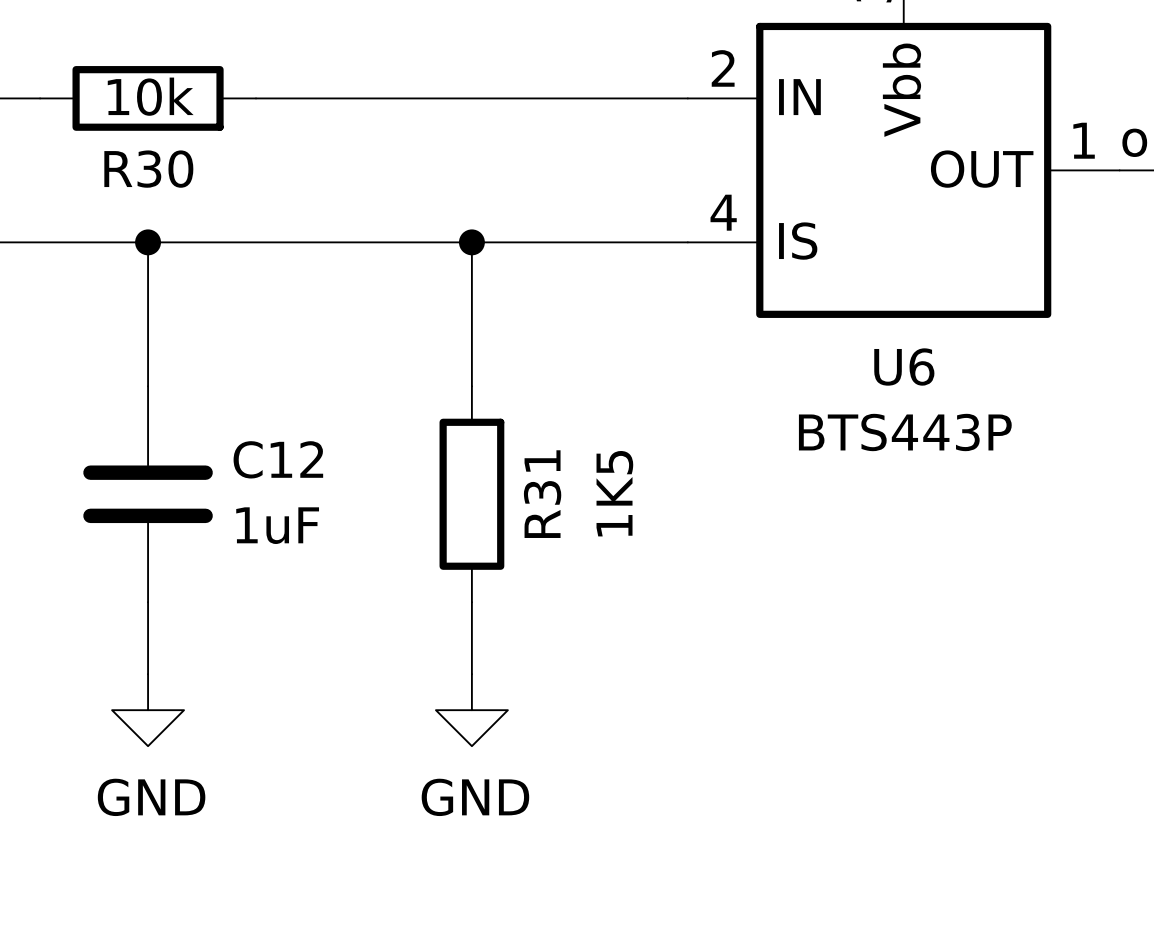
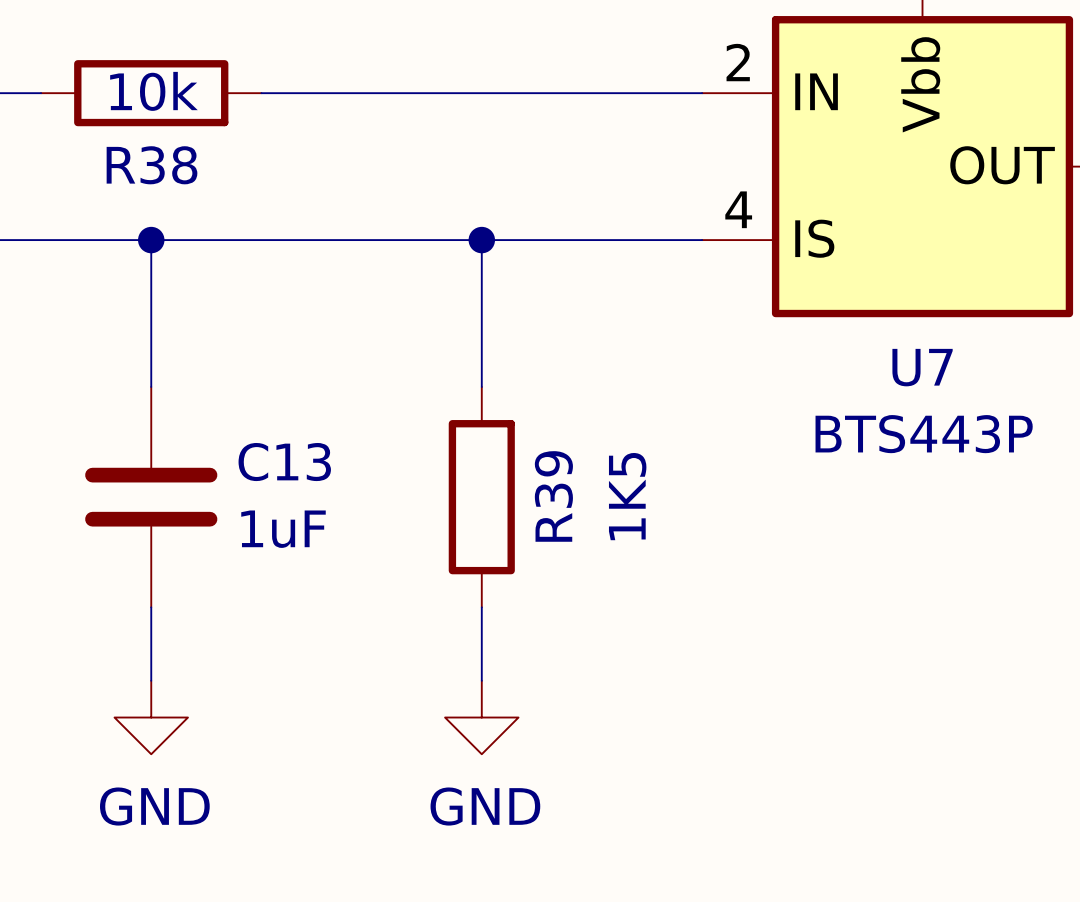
R30 name: R30 (148, 169) -> R38 (152, 165)
U6 name: U6 (904, 367) -> U7 (922, 367)
C12 name: C12 (278, 459) -> C13 (284, 462)
R31 name: R31 (542, 494) -> R39 (553, 496)

